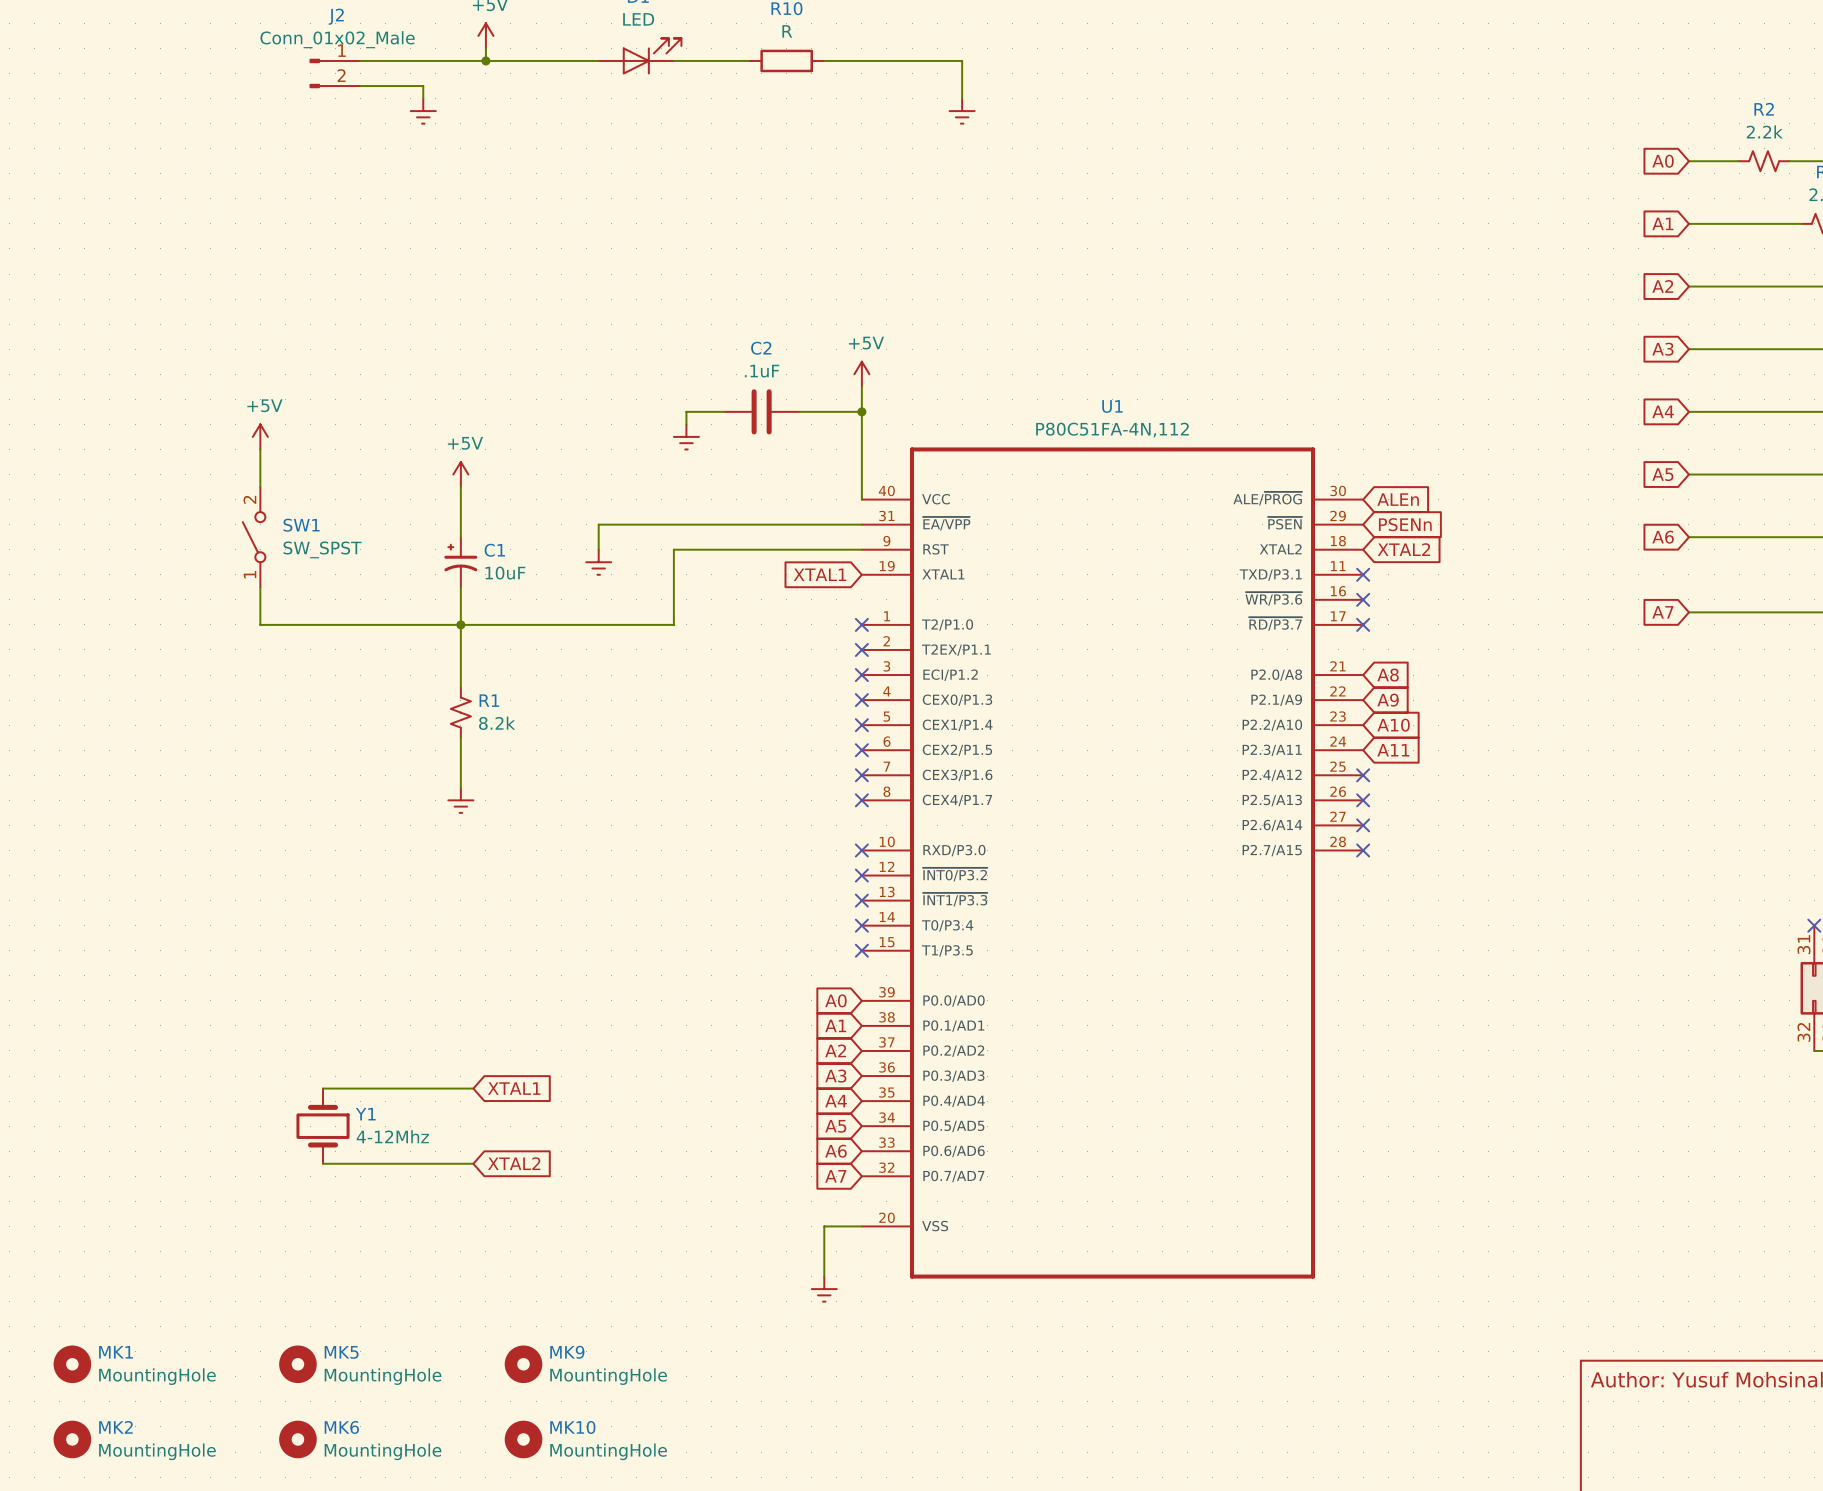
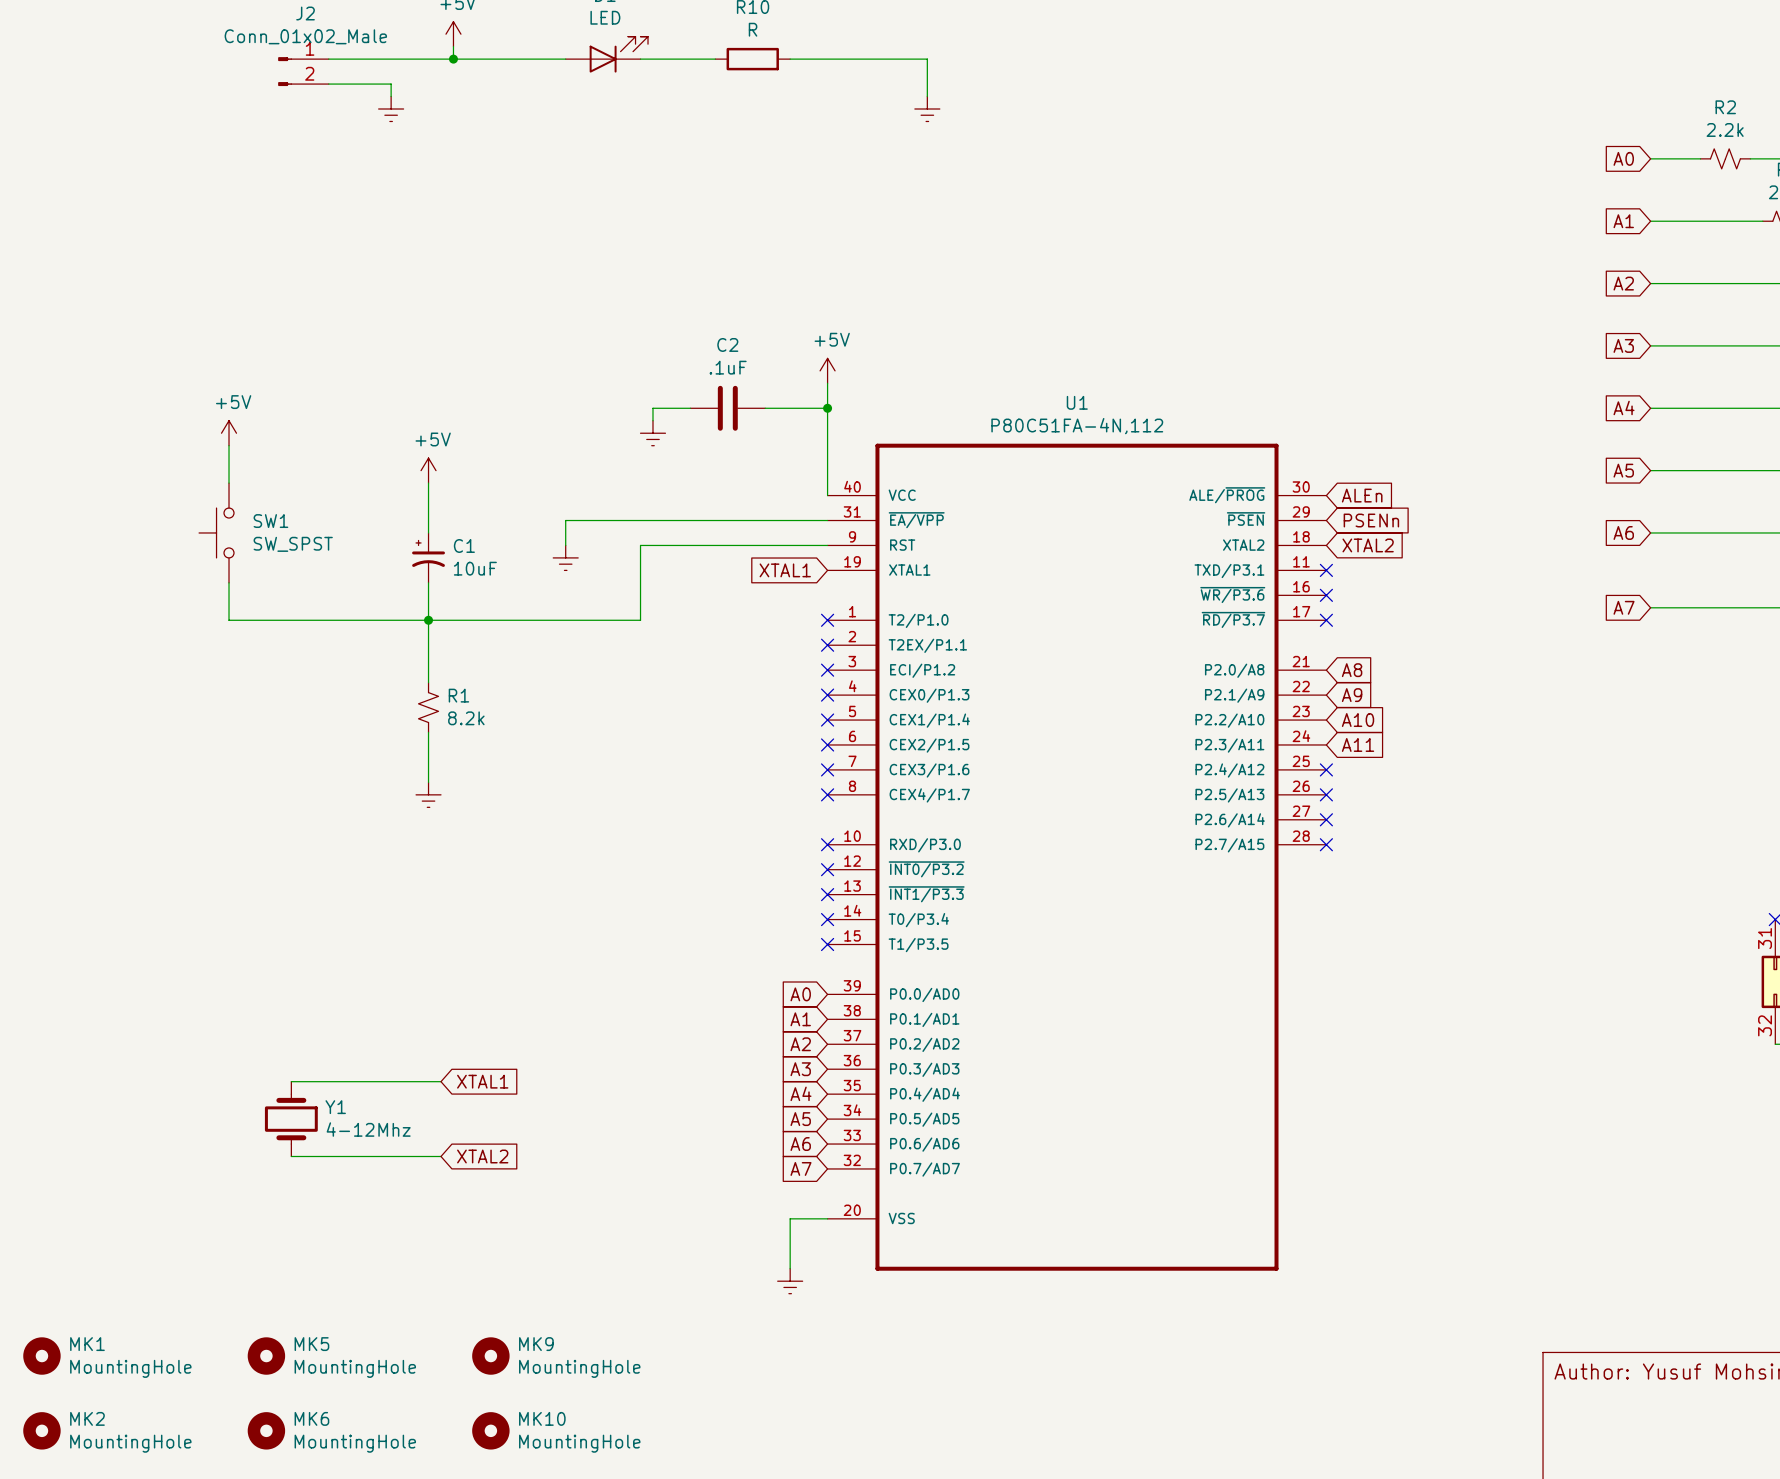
SW1 symbol: [242, 487, 266, 588] -> [199, 483, 234, 583]

